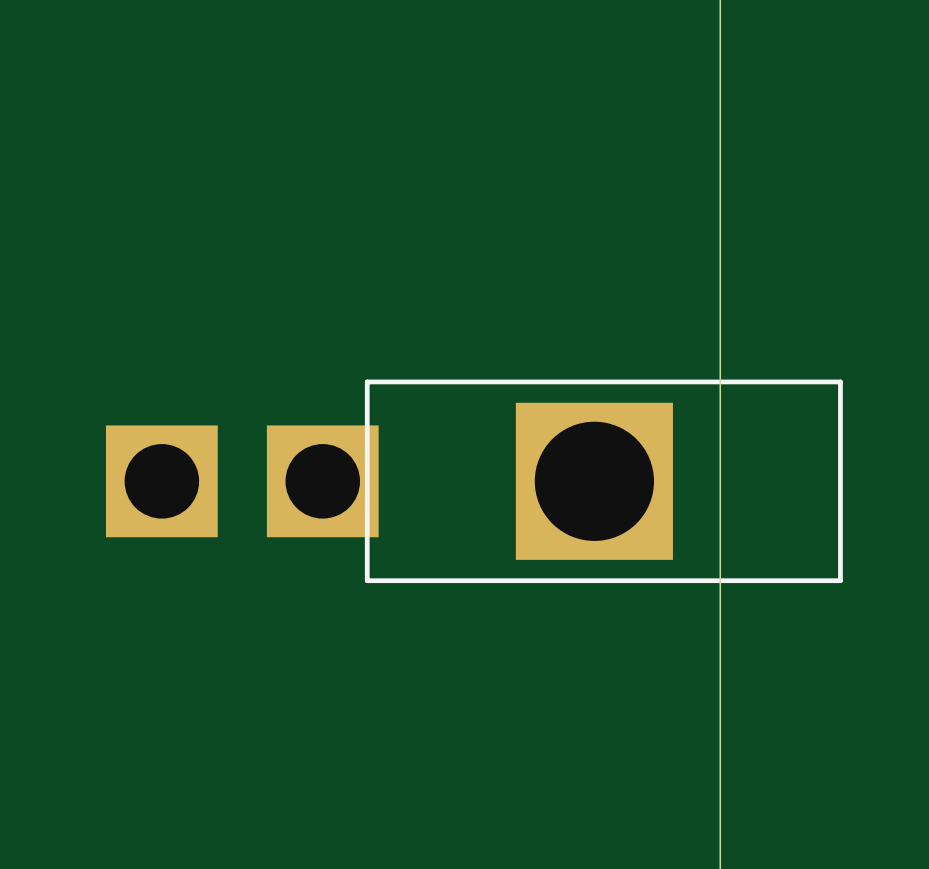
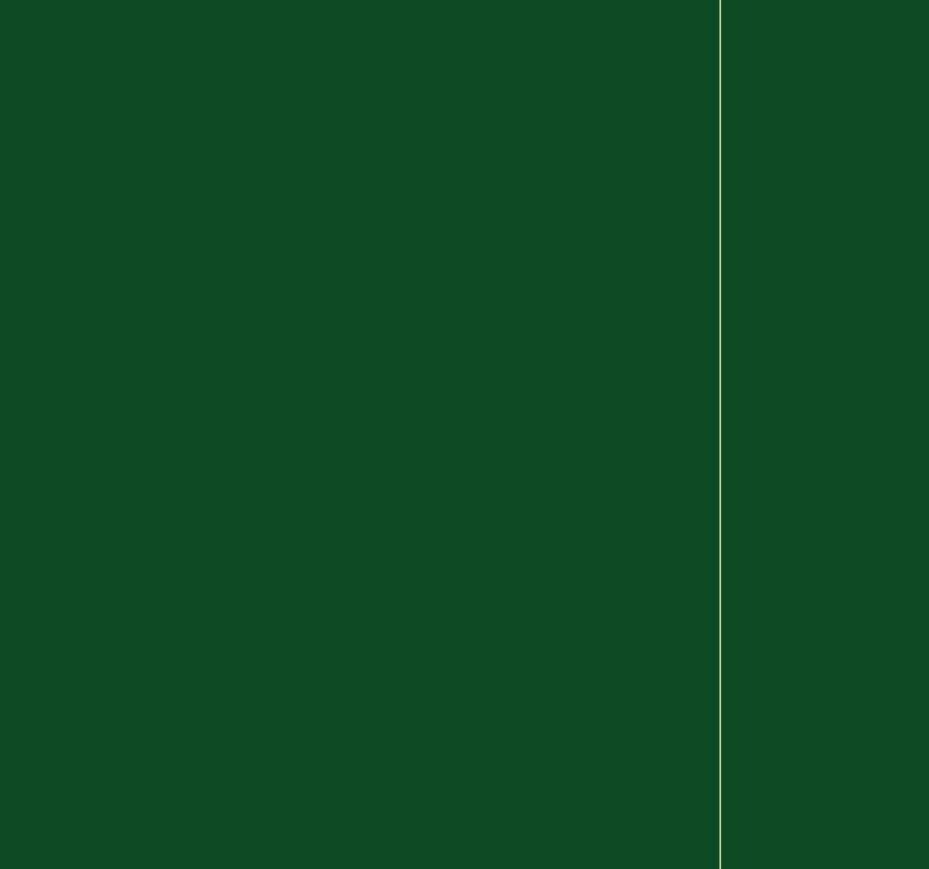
part: (474, 481) -> none

